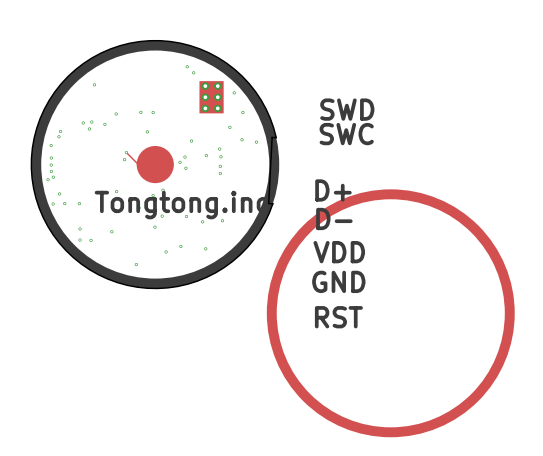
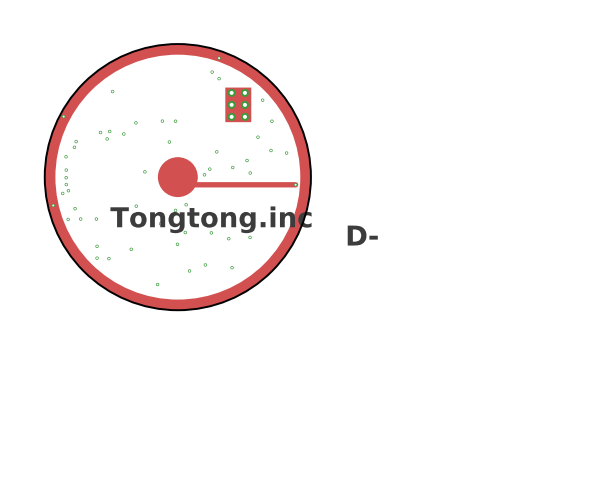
round board edge: none -> [44, 43, 312, 311]
drawing: [31, 40, 280, 289] -> none
text: SWD (347, 109) -> none
text: SWC (346, 134) -> none
board edge: (272, 137) (268, 203) (272, 203) (259, 231) (240, 254) (224, 267) (197, 281) (177, 286) (147, 288) (127, 285) (98, 274) (81, 264) (66, 250) (47, 226) (39, 208) (33, 188) (31, 158) (34, 138) (44, 109) (54, 91) (68, 76) (83, 63) (110, 49) (129, 43) (160, 40) (180, 43) (209, 52) (226, 63) (249, 83) (261, 100) (273, 127) (276, 137) (272, 137) -> none
track: (126, 152) (138, 164) (155, 164) -> (295, 184) (185, 184) (177, 177)
via: (126, 152) -> none
via: (220, 156) -> none
via: none -> (250, 173)
via: (220, 166) -> none
via: (185, 168) -> none
via: none -> (295, 184)
via: (220, 173) -> none
text: D+ (333, 190) -> none
text: VDD (339, 252) -> none
text: GND (338, 281) -> none
drawing position: (390, 313) -> (177, 177)
text: RST (338, 317) -> none

